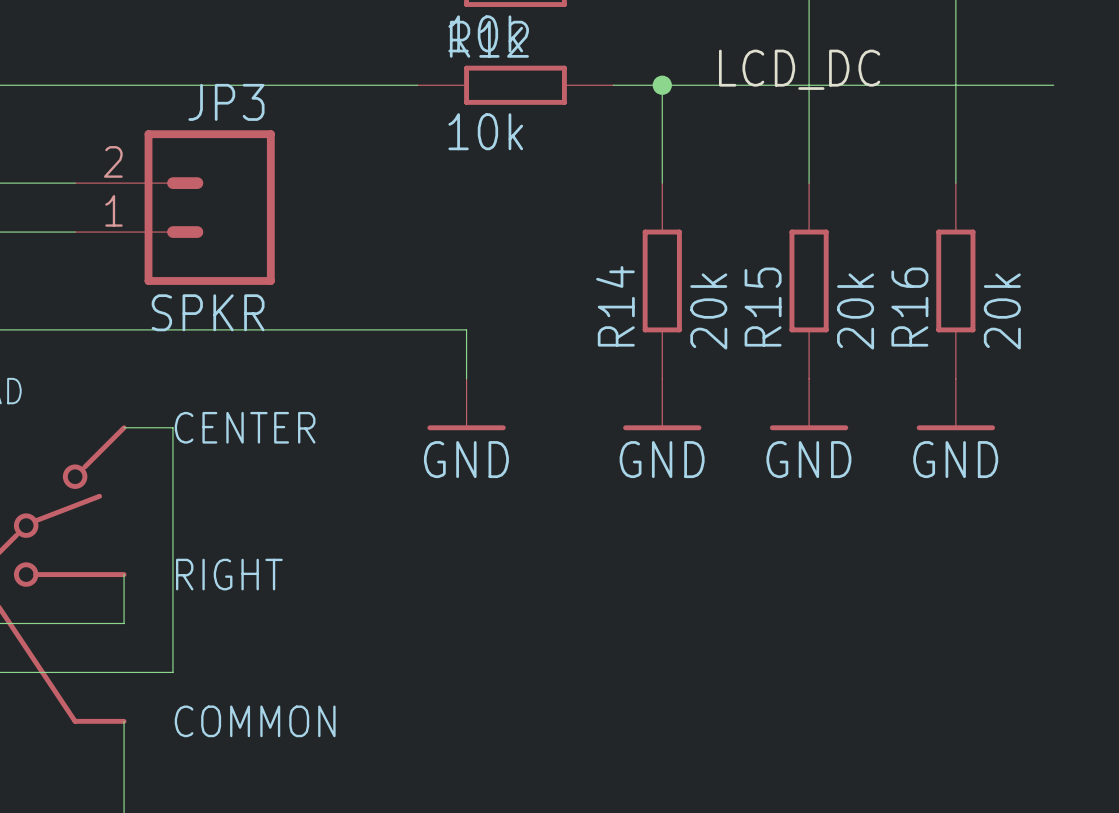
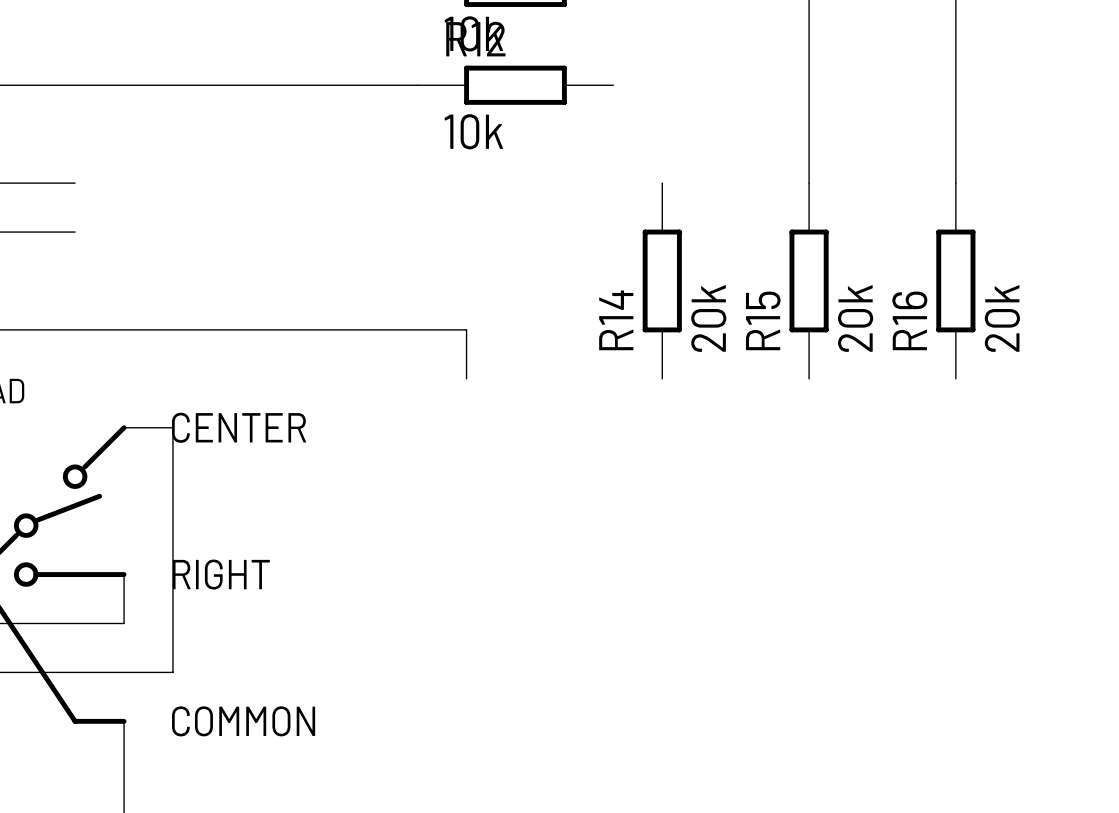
label: LCD_DC (799, 69) -> none
wire: (613, 85) (1053, 85) -> none
wire: (662, 85) (662, 183) -> none
junction: (662, 85) -> none
JP3: SPKR (174, 207) -> none
power symbol: GND (466, 404) -> none
power symbol: GND (662, 404) -> none
power symbol: GND (809, 404) -> none
power symbol: GND (955, 404) -> none

